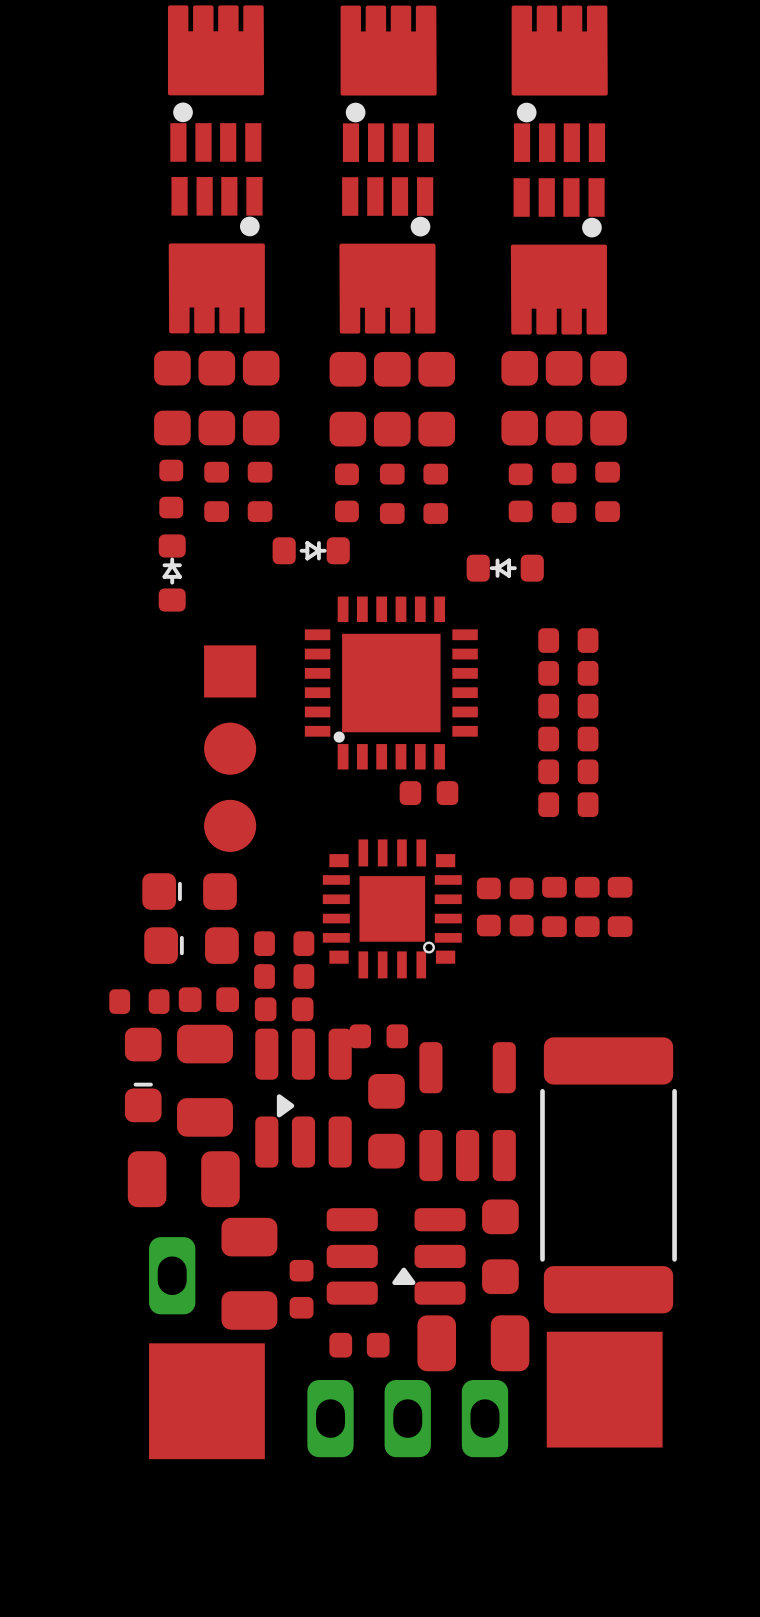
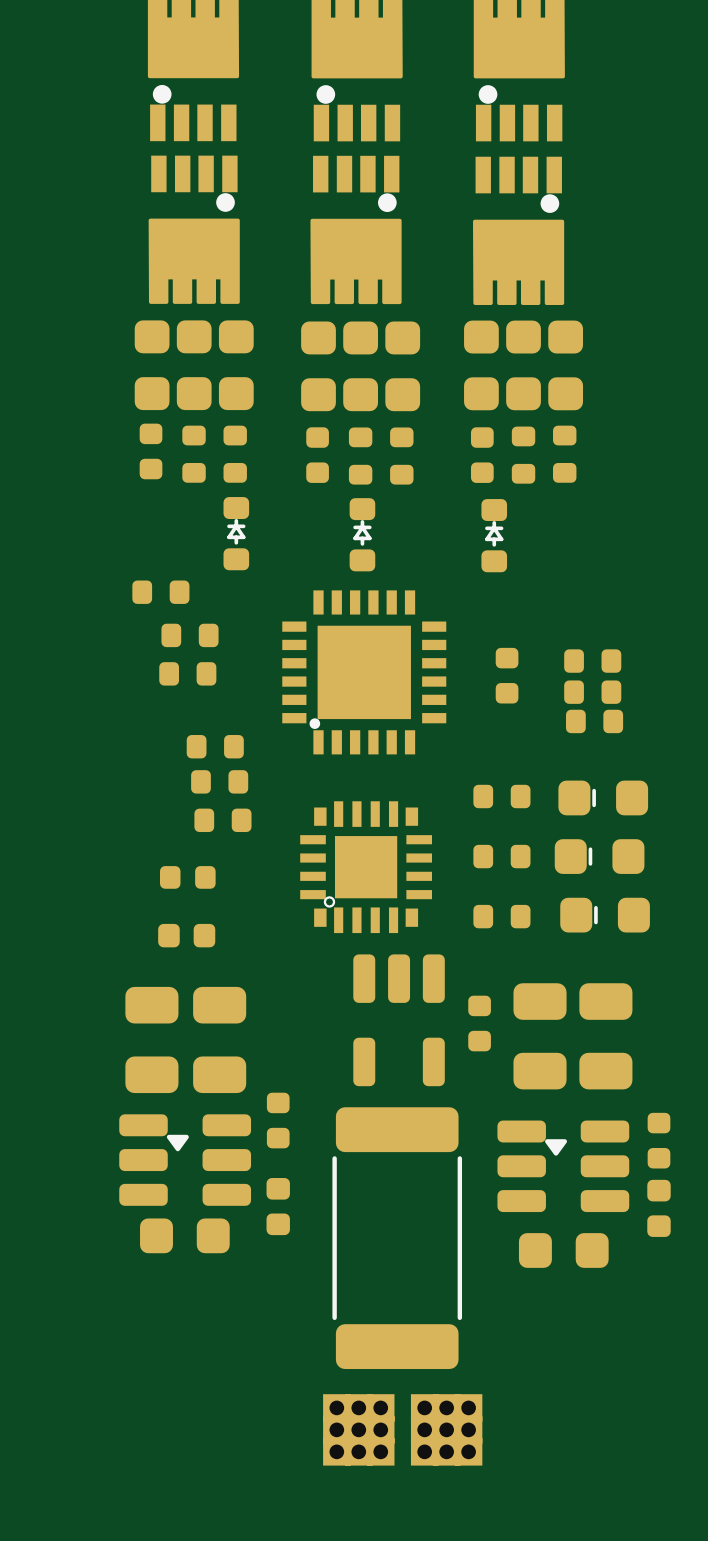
part: (311, 550) -> none
part rotation: 0° (505, 568) -> 90° clockwise (494, 535)
part: (172, 572) -> none
part: none -> (236, 533)
part: none -> (362, 534)
part: none -> (160, 592)
part: (568, 640) -> none
part: (568, 673) -> none
part: none -> (190, 635)
part position: (391, 683) -> (364, 672)
part: (568, 706) -> none
part: none -> (592, 661)
part: none -> (187, 673)
part: none -> (507, 675)
part: (568, 739) -> none
part: none -> (592, 692)
part: (230, 748) -> none
part: (568, 771) -> none
part: none -> (594, 721)
part: (428, 793) -> none
part: none -> (215, 746)
part: (568, 804) -> none
part: none -> (219, 781)
part: none -> (501, 796)
part: none -> (603, 797)
part footprint: [607, 876, 633, 938] -> [554, 839, 645, 874]
part: none -> (222, 820)
part: (189, 891) -> none
part: (488, 906) -> none
part: (521, 906) -> none
part rotation: 0° (554, 906) -> 90° clockwise (501, 856)
part: (587, 906) -> none
part rotation: 0° (392, 908) -> 90° clockwise (366, 867)
part footprint: [144, 927, 239, 964] -> [159, 866, 216, 889]
part: (284, 943) -> none
part: (284, 976) -> none
part: none -> (605, 915)
part: none -> (501, 916)
part: (139, 1001) -> none
part: (284, 1009) -> none
part: (378, 1036) -> none
part: (143, 1074) -> none
part: (205, 1080) -> none
part: none -> (479, 1023)
part rotation: 0° (303, 1098) -> 90° clockwise (185, 1160)
part position: (303, 1098) -> (185, 1160)
part: none -> (540, 1036)
part: none -> (605, 1036)
part: none -> (151, 1039)
part: none -> (219, 1039)
part rotation: 0° (467, 1111) -> 180° (399, 1020)
part: (386, 1121) -> none
part position: (608, 1175) -> (397, 1238)
part: (183, 1179) -> none
part: none -> (278, 1120)
part: none -> (658, 1140)
part rotation: 0° (500, 1246) -> 90° clockwise (563, 1250)
part position: (500, 1246) -> (563, 1250)
part rotation: 0° (396, 1256) -> 180° (563, 1166)
part position: (396, 1256) -> (563, 1166)
part footprint: [289, 1259, 314, 1319] -> [266, 1178, 290, 1236]
part: (249, 1273) -> none
part: (172, 1275) -> none
part: none -> (184, 1235)
part: (473, 1343) -> none
part rotation: 0° (359, 1345) -> 90° clockwise (658, 1208)
part position: (359, 1345) -> (658, 1208)
part: (604, 1389) -> none
part: (206, 1401) -> none
part: (407, 1418) -> none
part: none -> (402, 1429)

